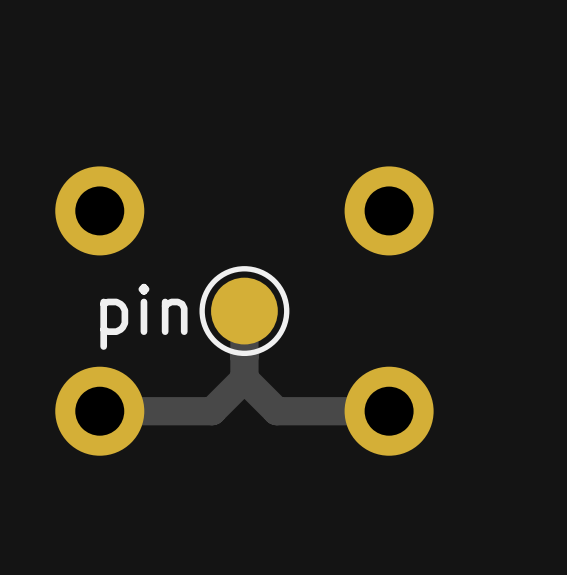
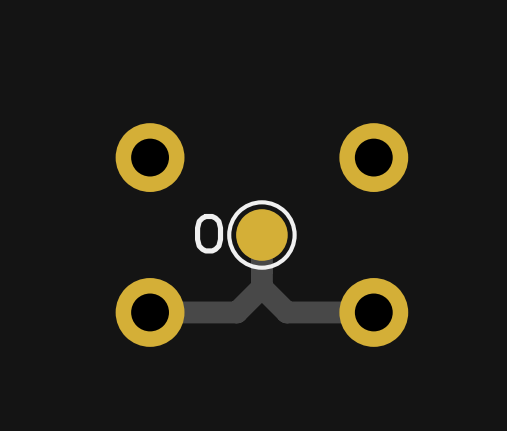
text: none -> O (209, 233)
text: pin (143, 316) -> none

